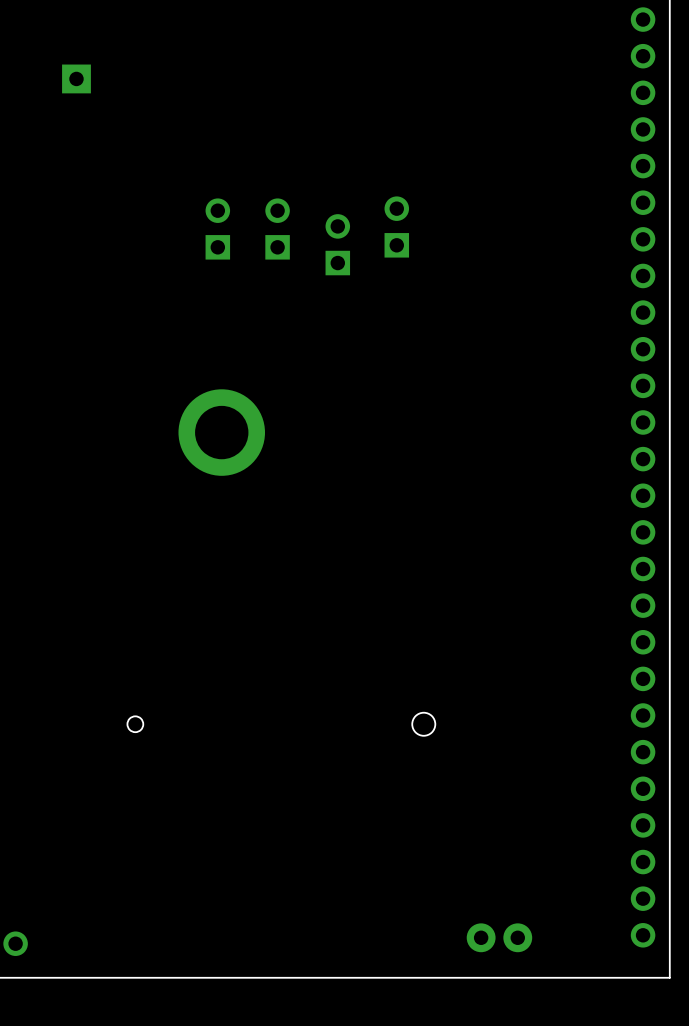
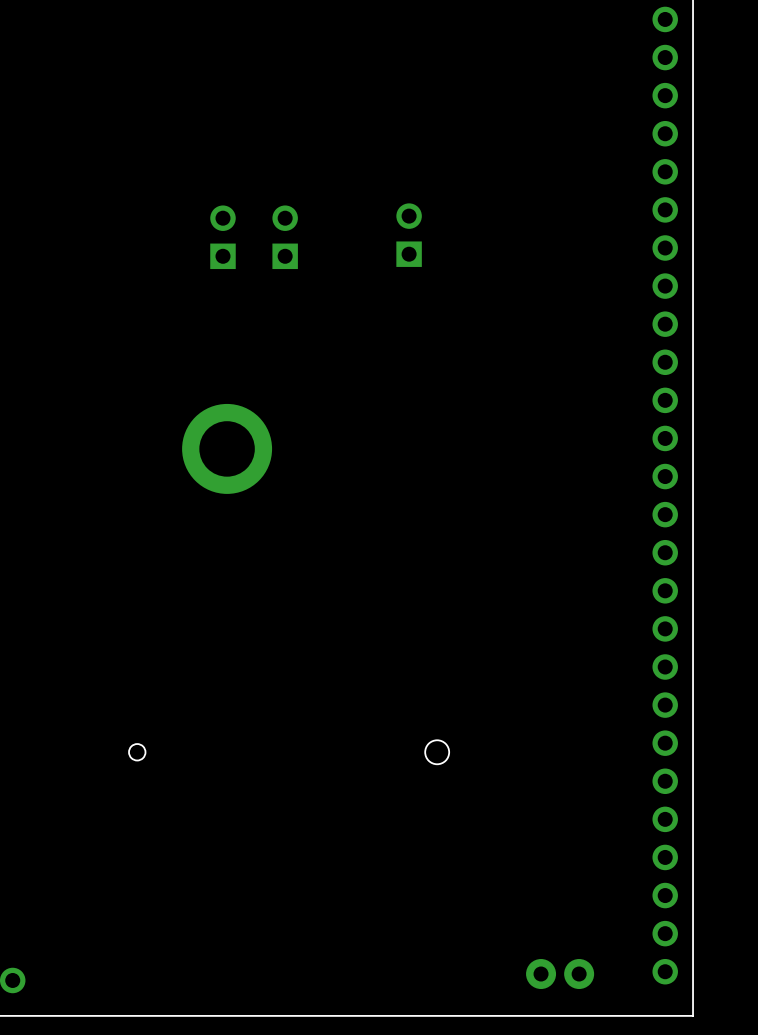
part: (76, 78) -> none
part: (337, 244) -> none
part position: (499, 937) -> (560, 974)

